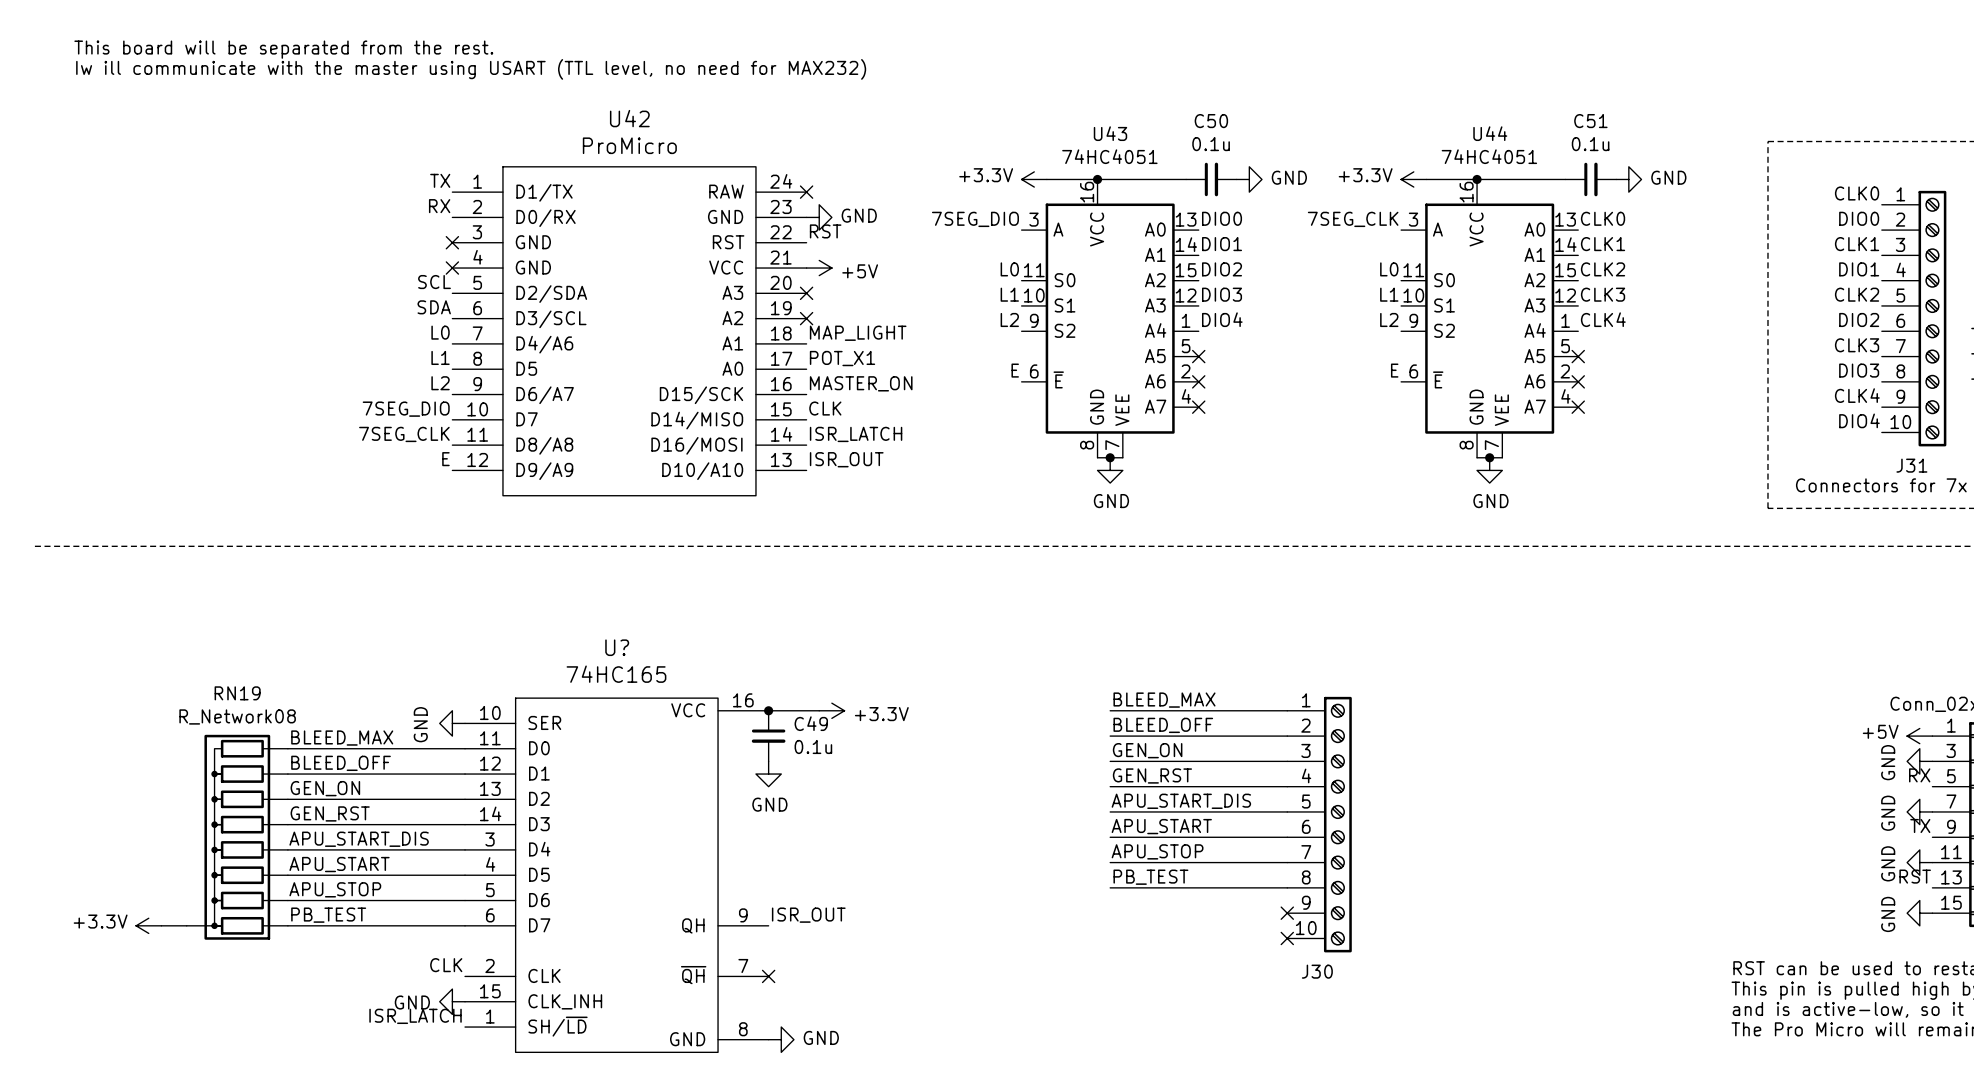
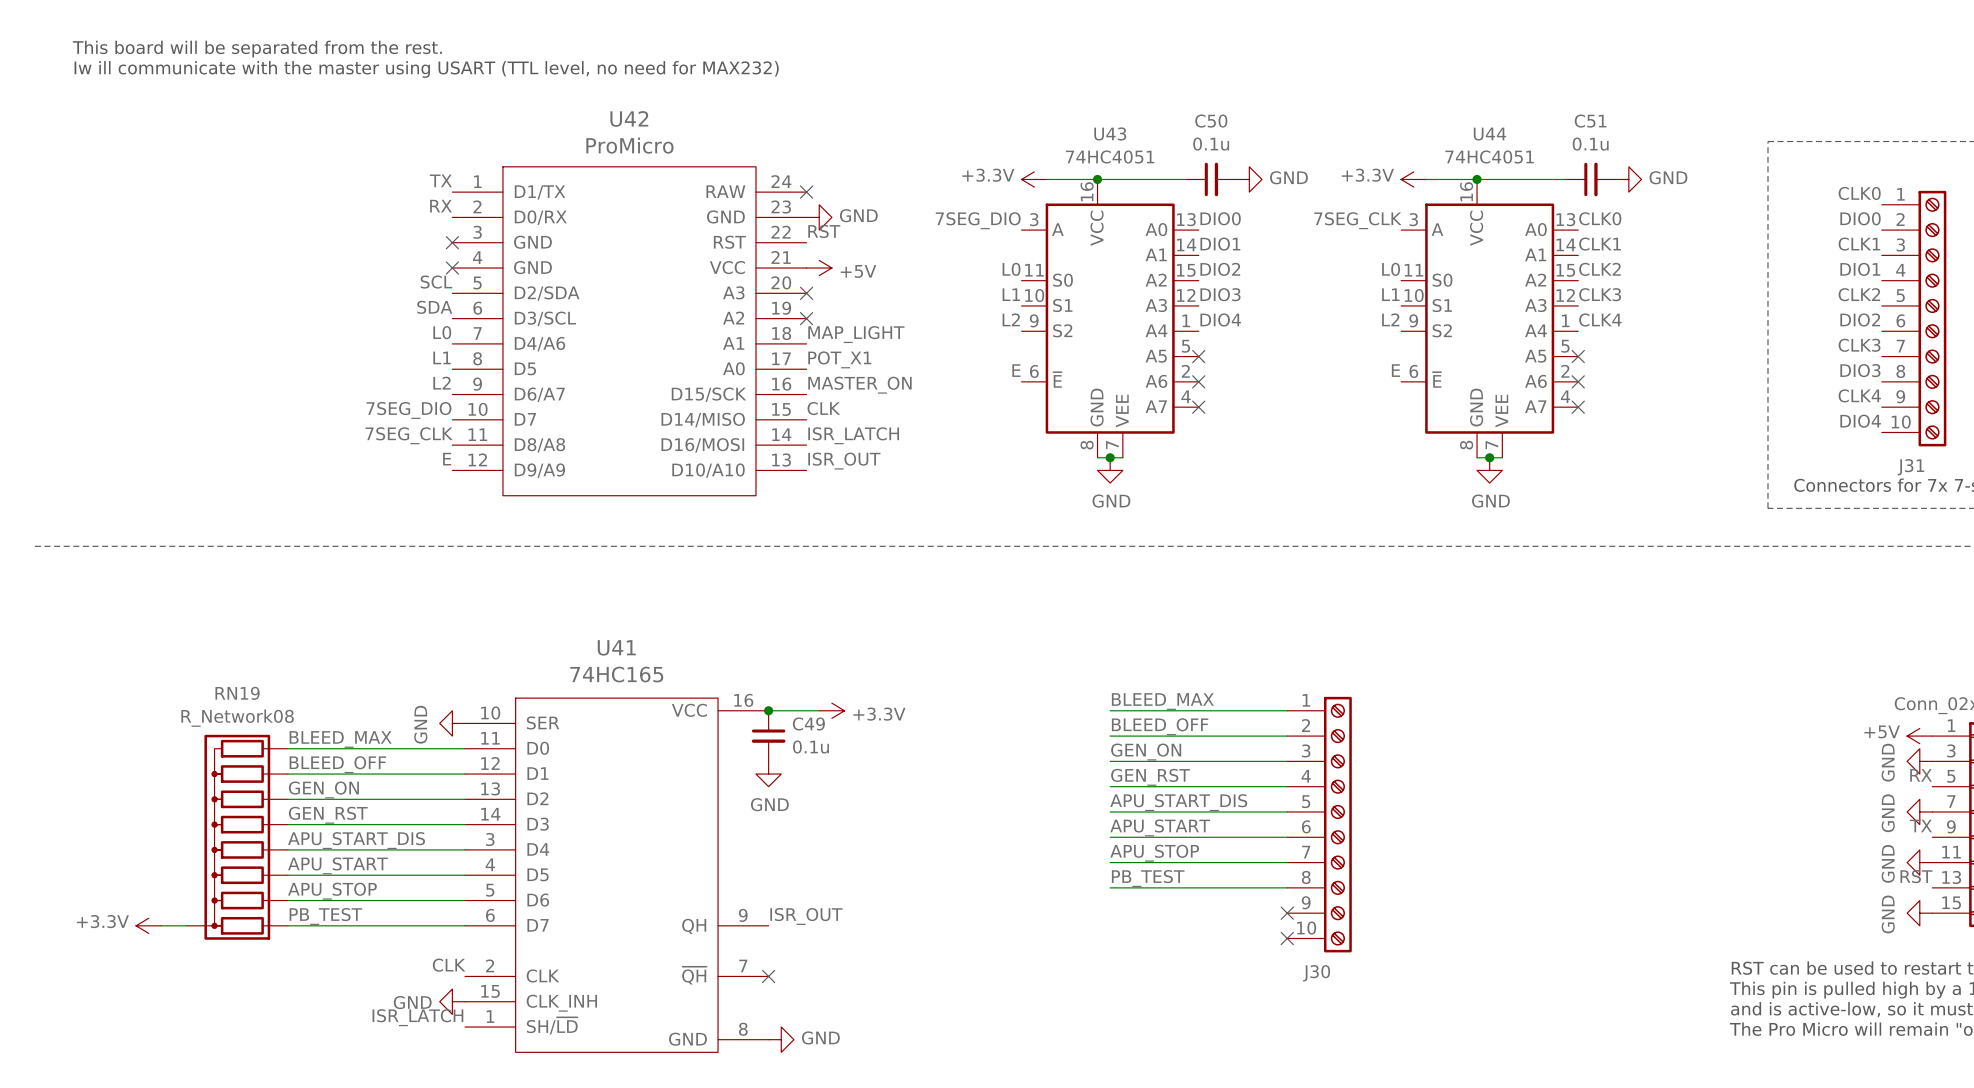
U? name: U? (617, 647) -> U41 (616, 647)

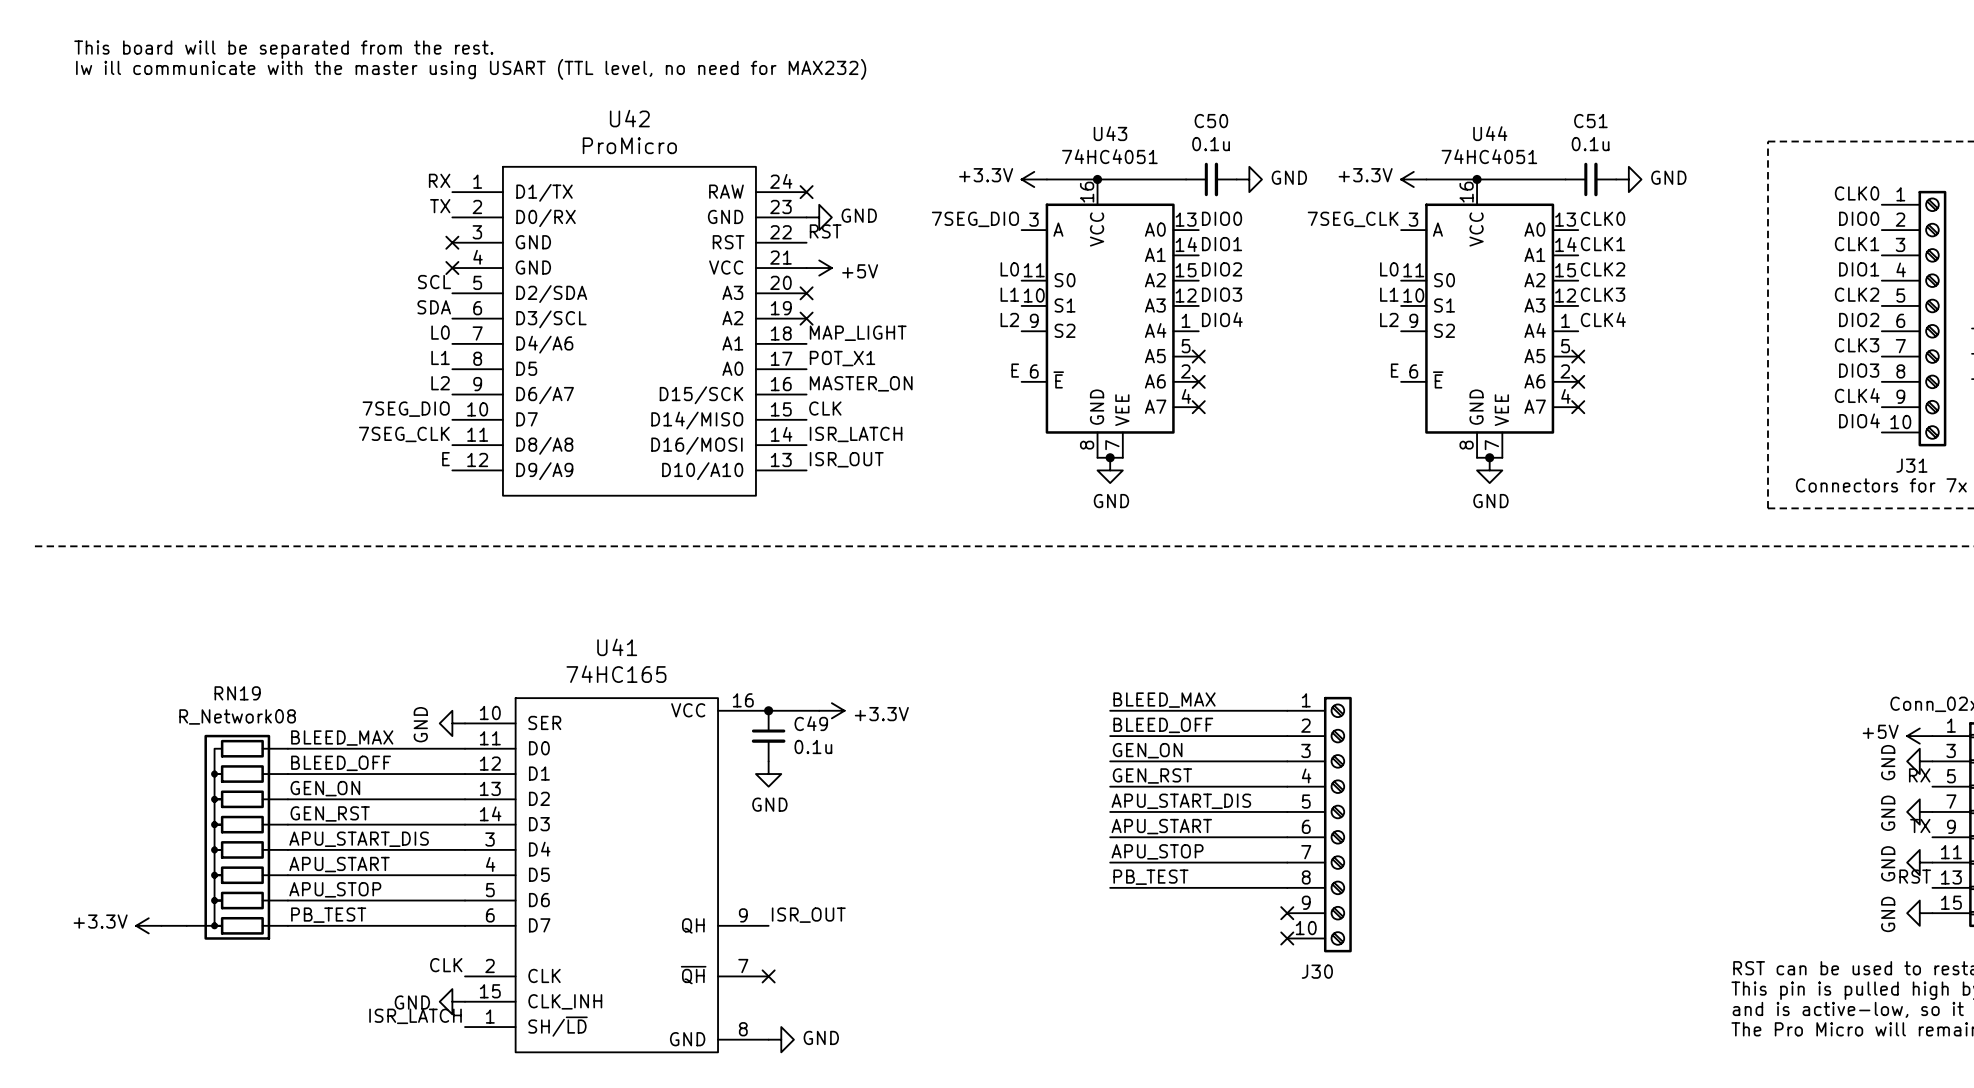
label: TX (440, 180) -> RX (439, 180)
label: RX (440, 206) -> TX (440, 206)

